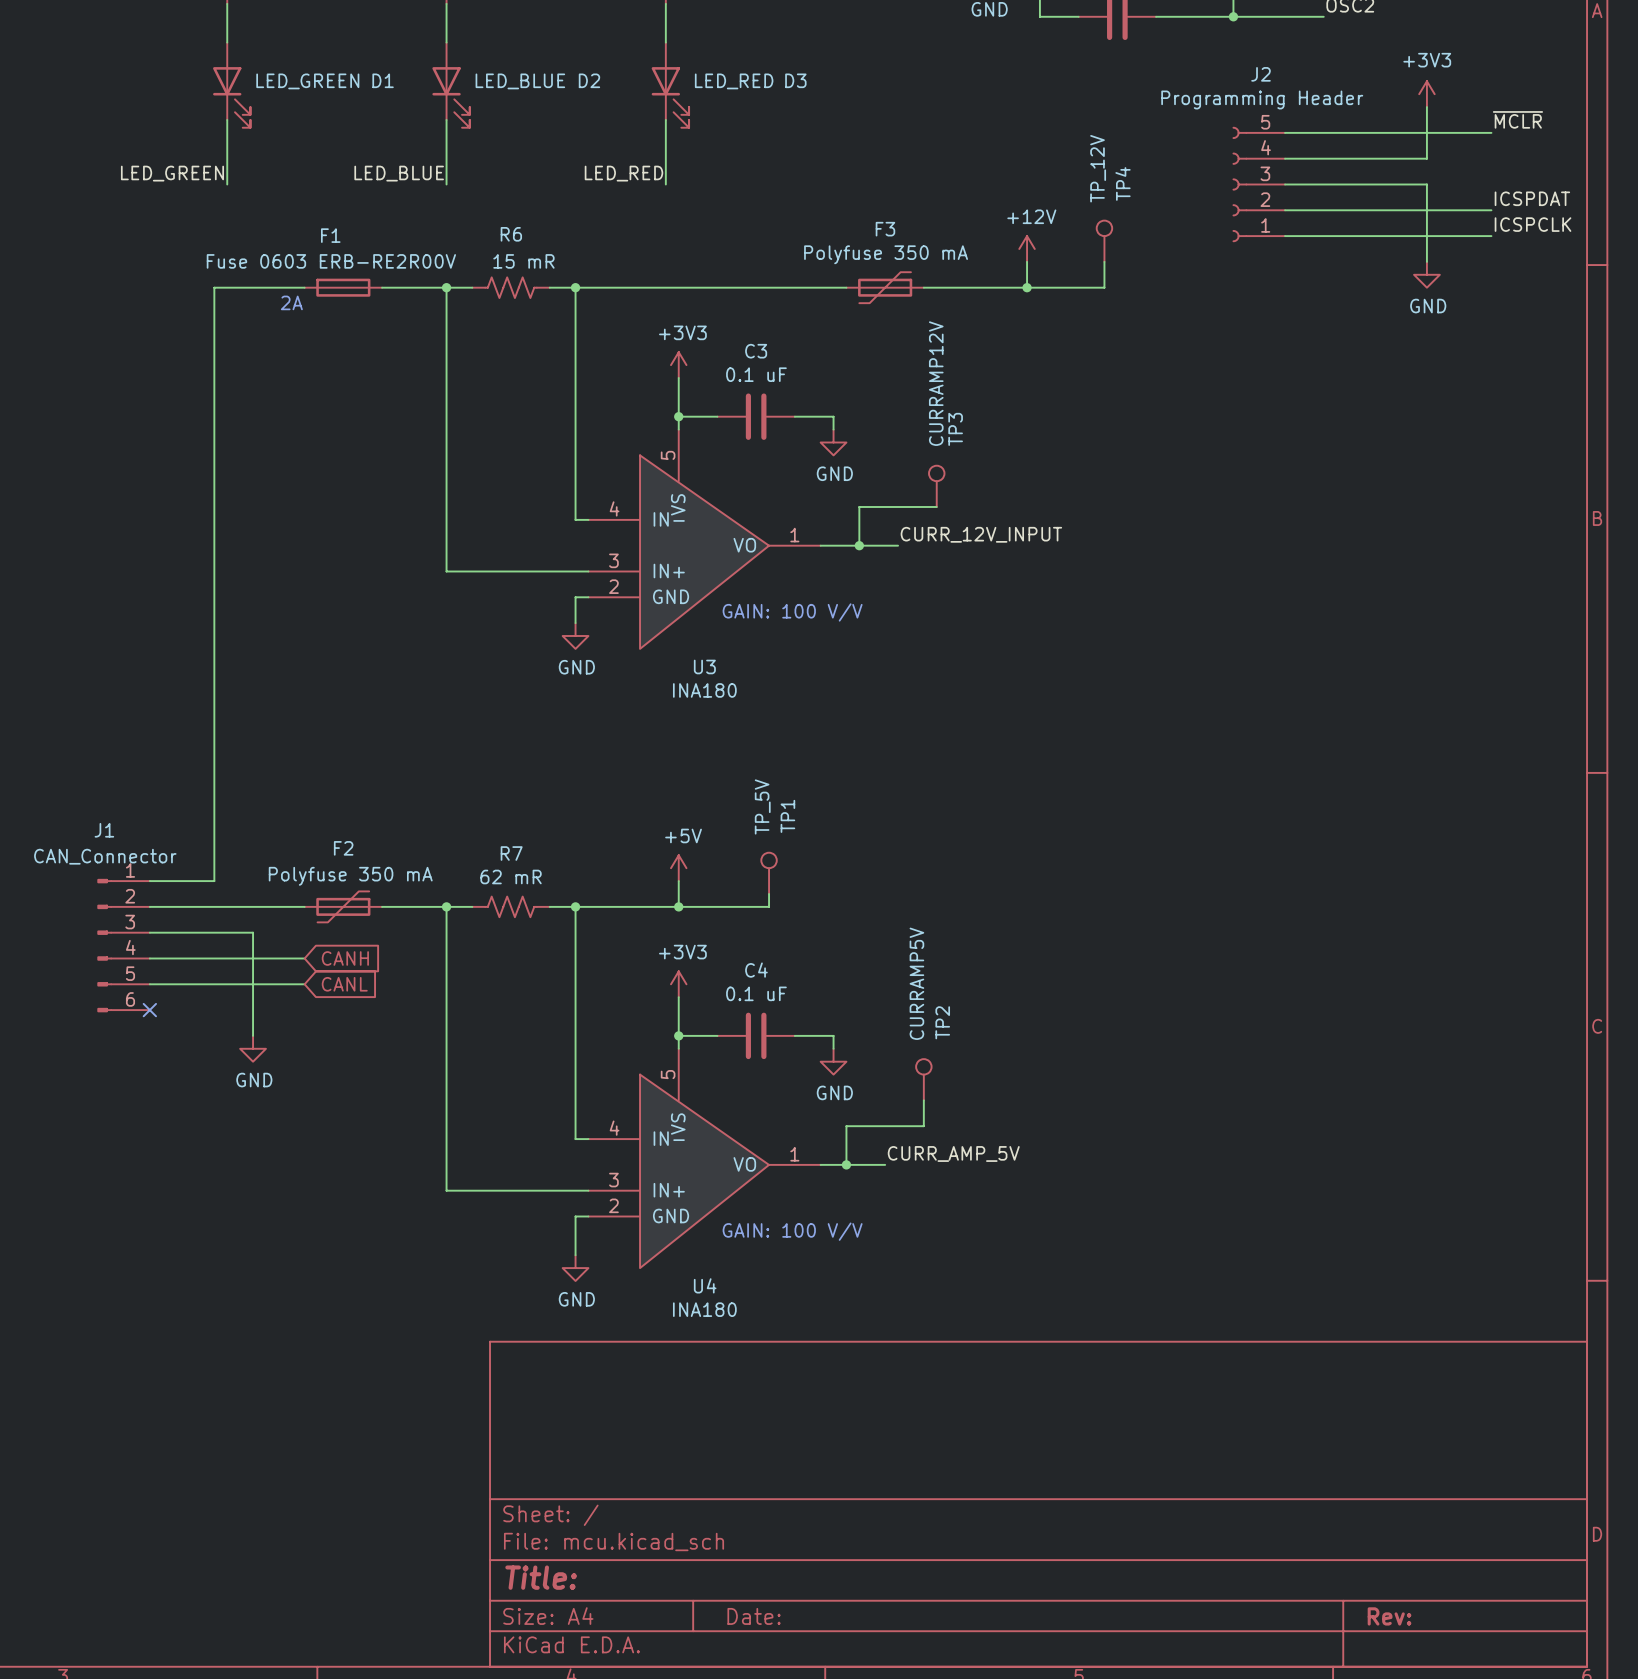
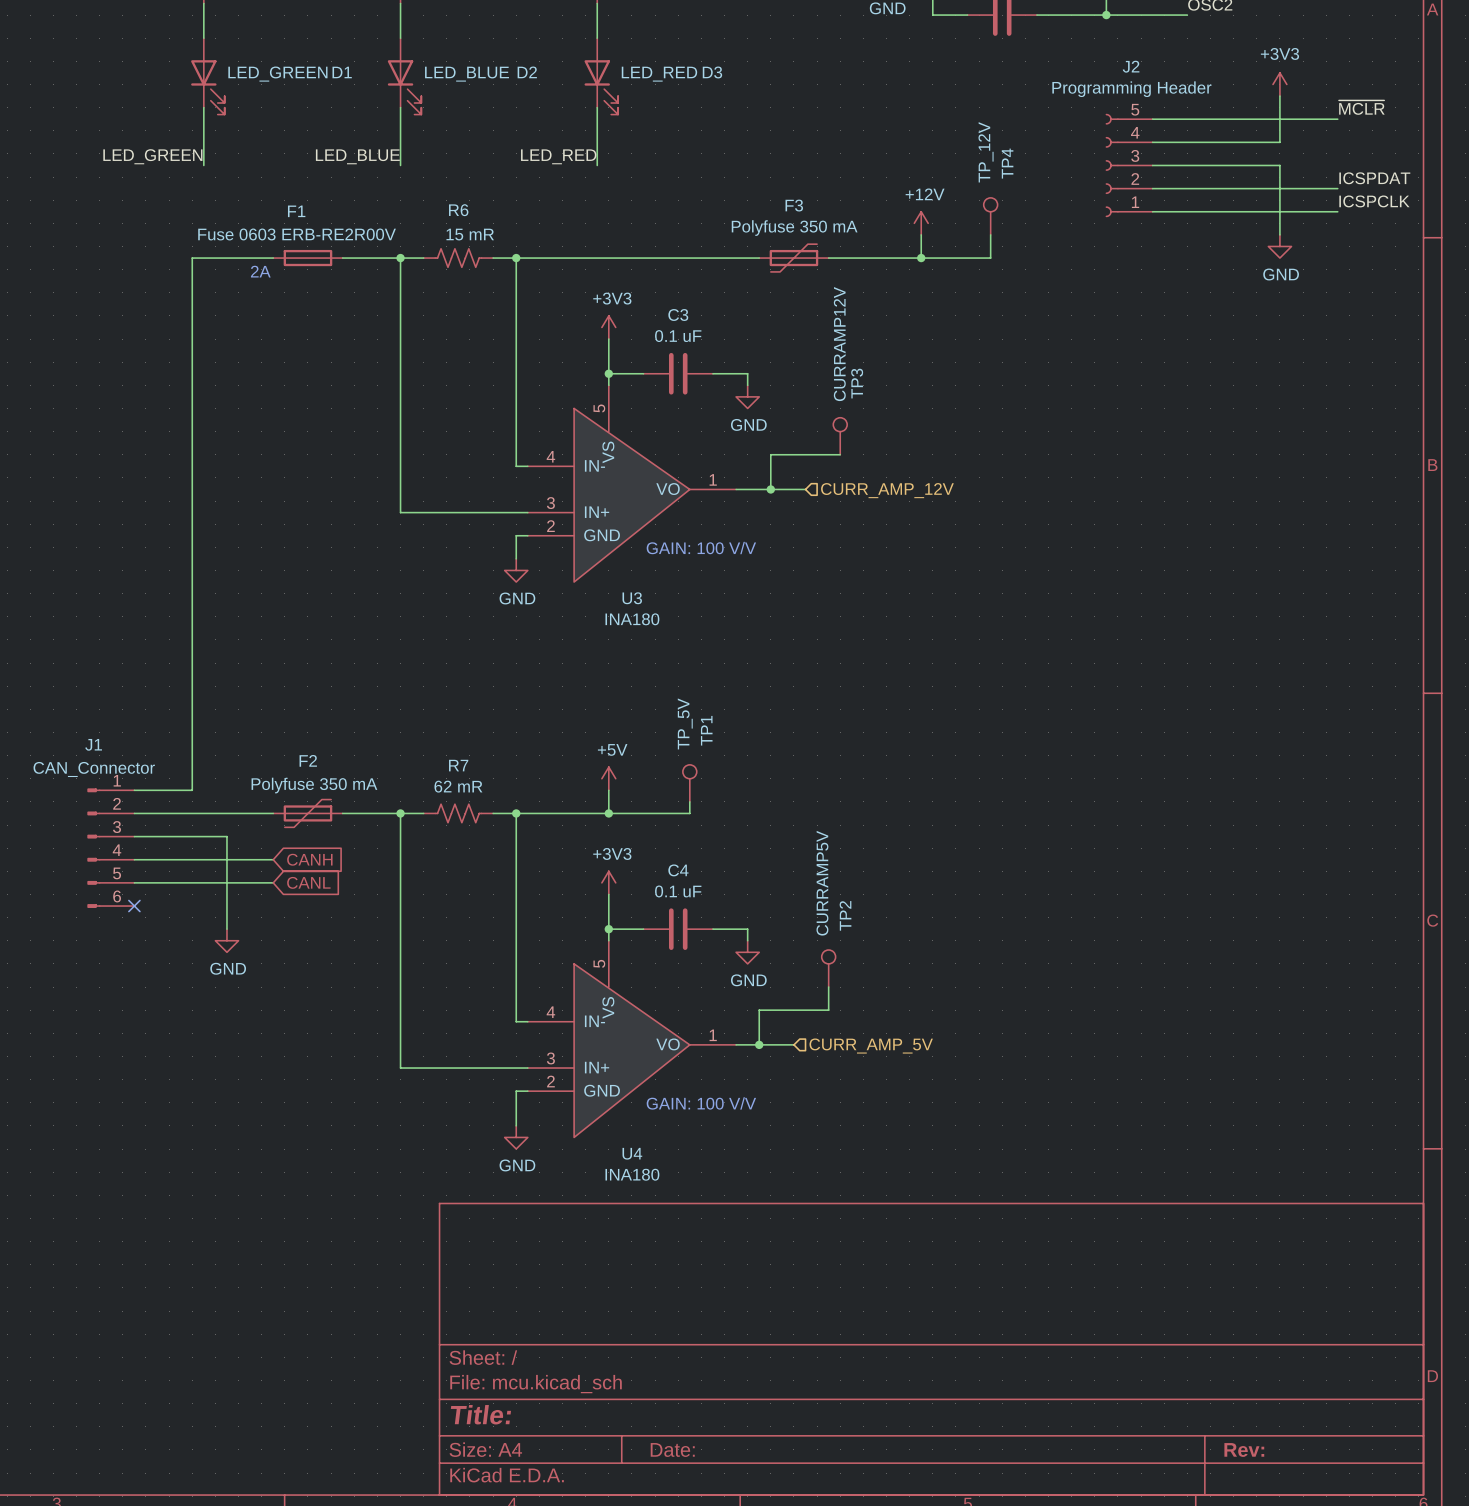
label: CURR_12V_INPUT (981, 534) -> none
hierarchical label: none -> CURR_AMP_12V (887, 490)
label: CURR_AMP_5V (953, 1153) -> none
hierarchical label: none -> CURR_AMP_5V (871, 1046)

